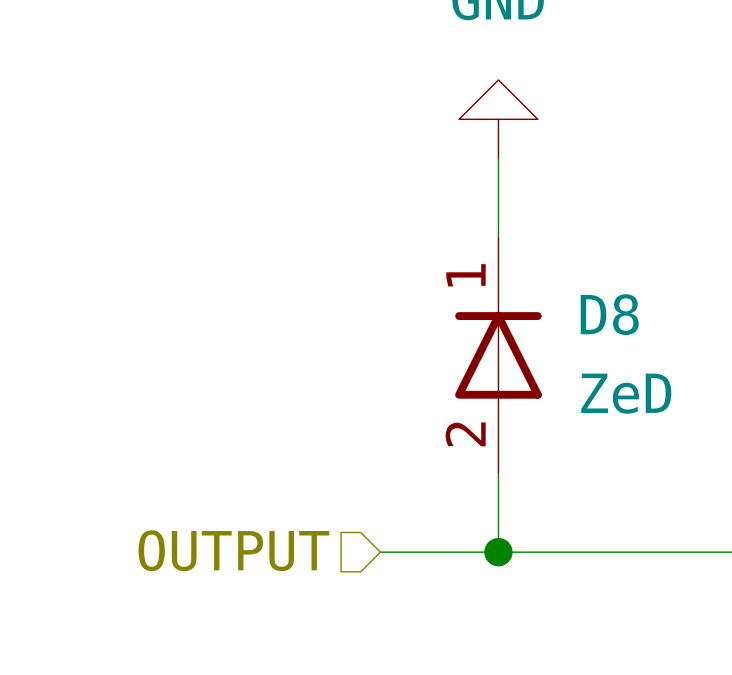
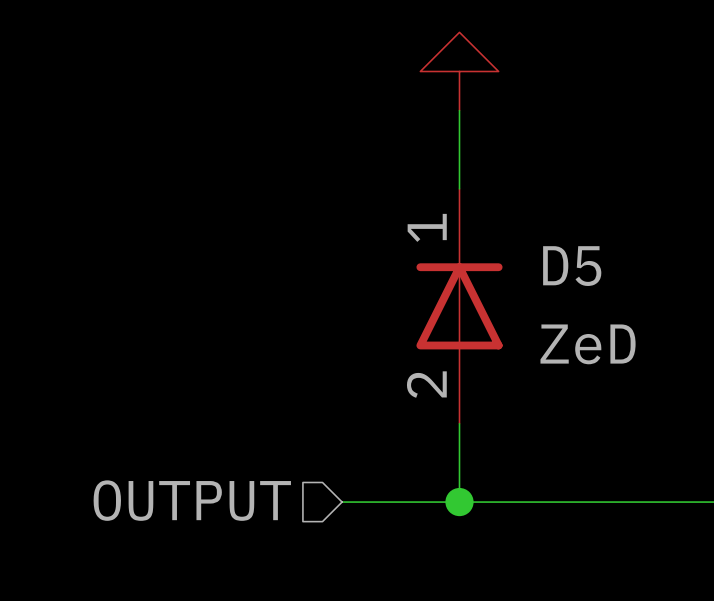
D8 name: D8 (609, 314) -> D5 (572, 266)

